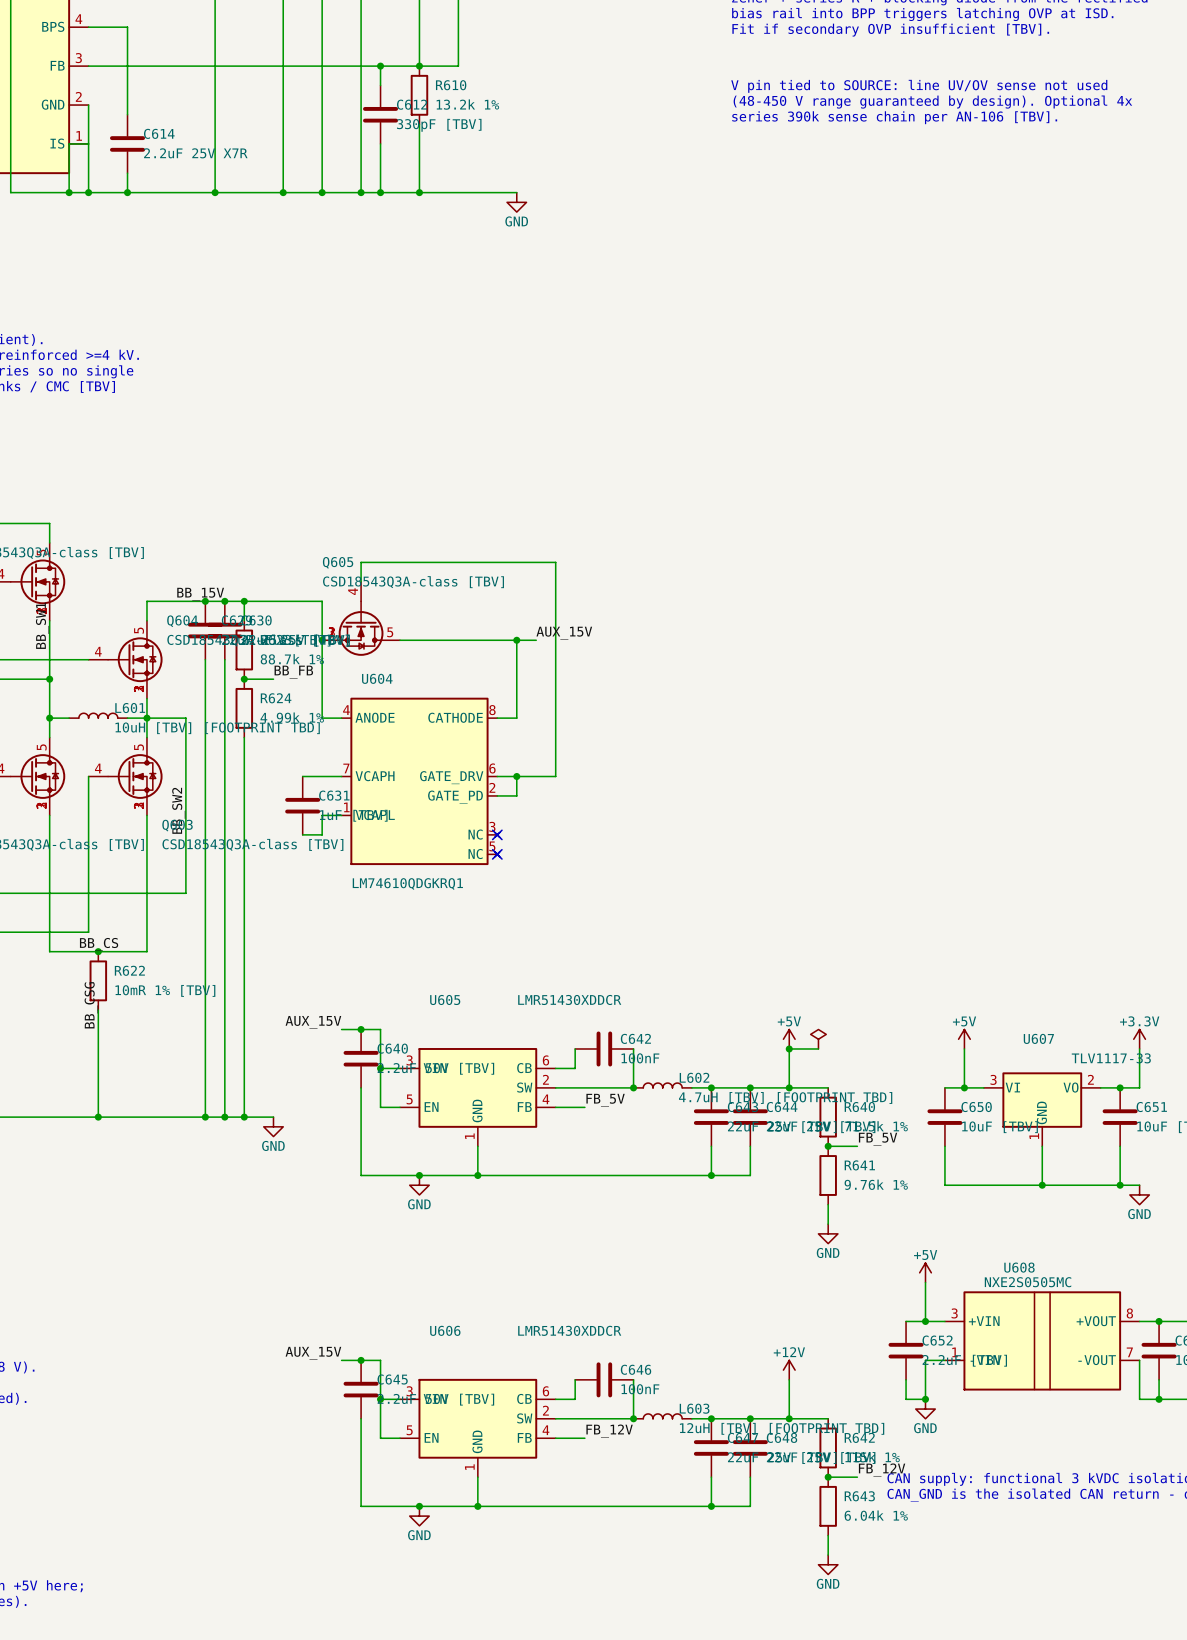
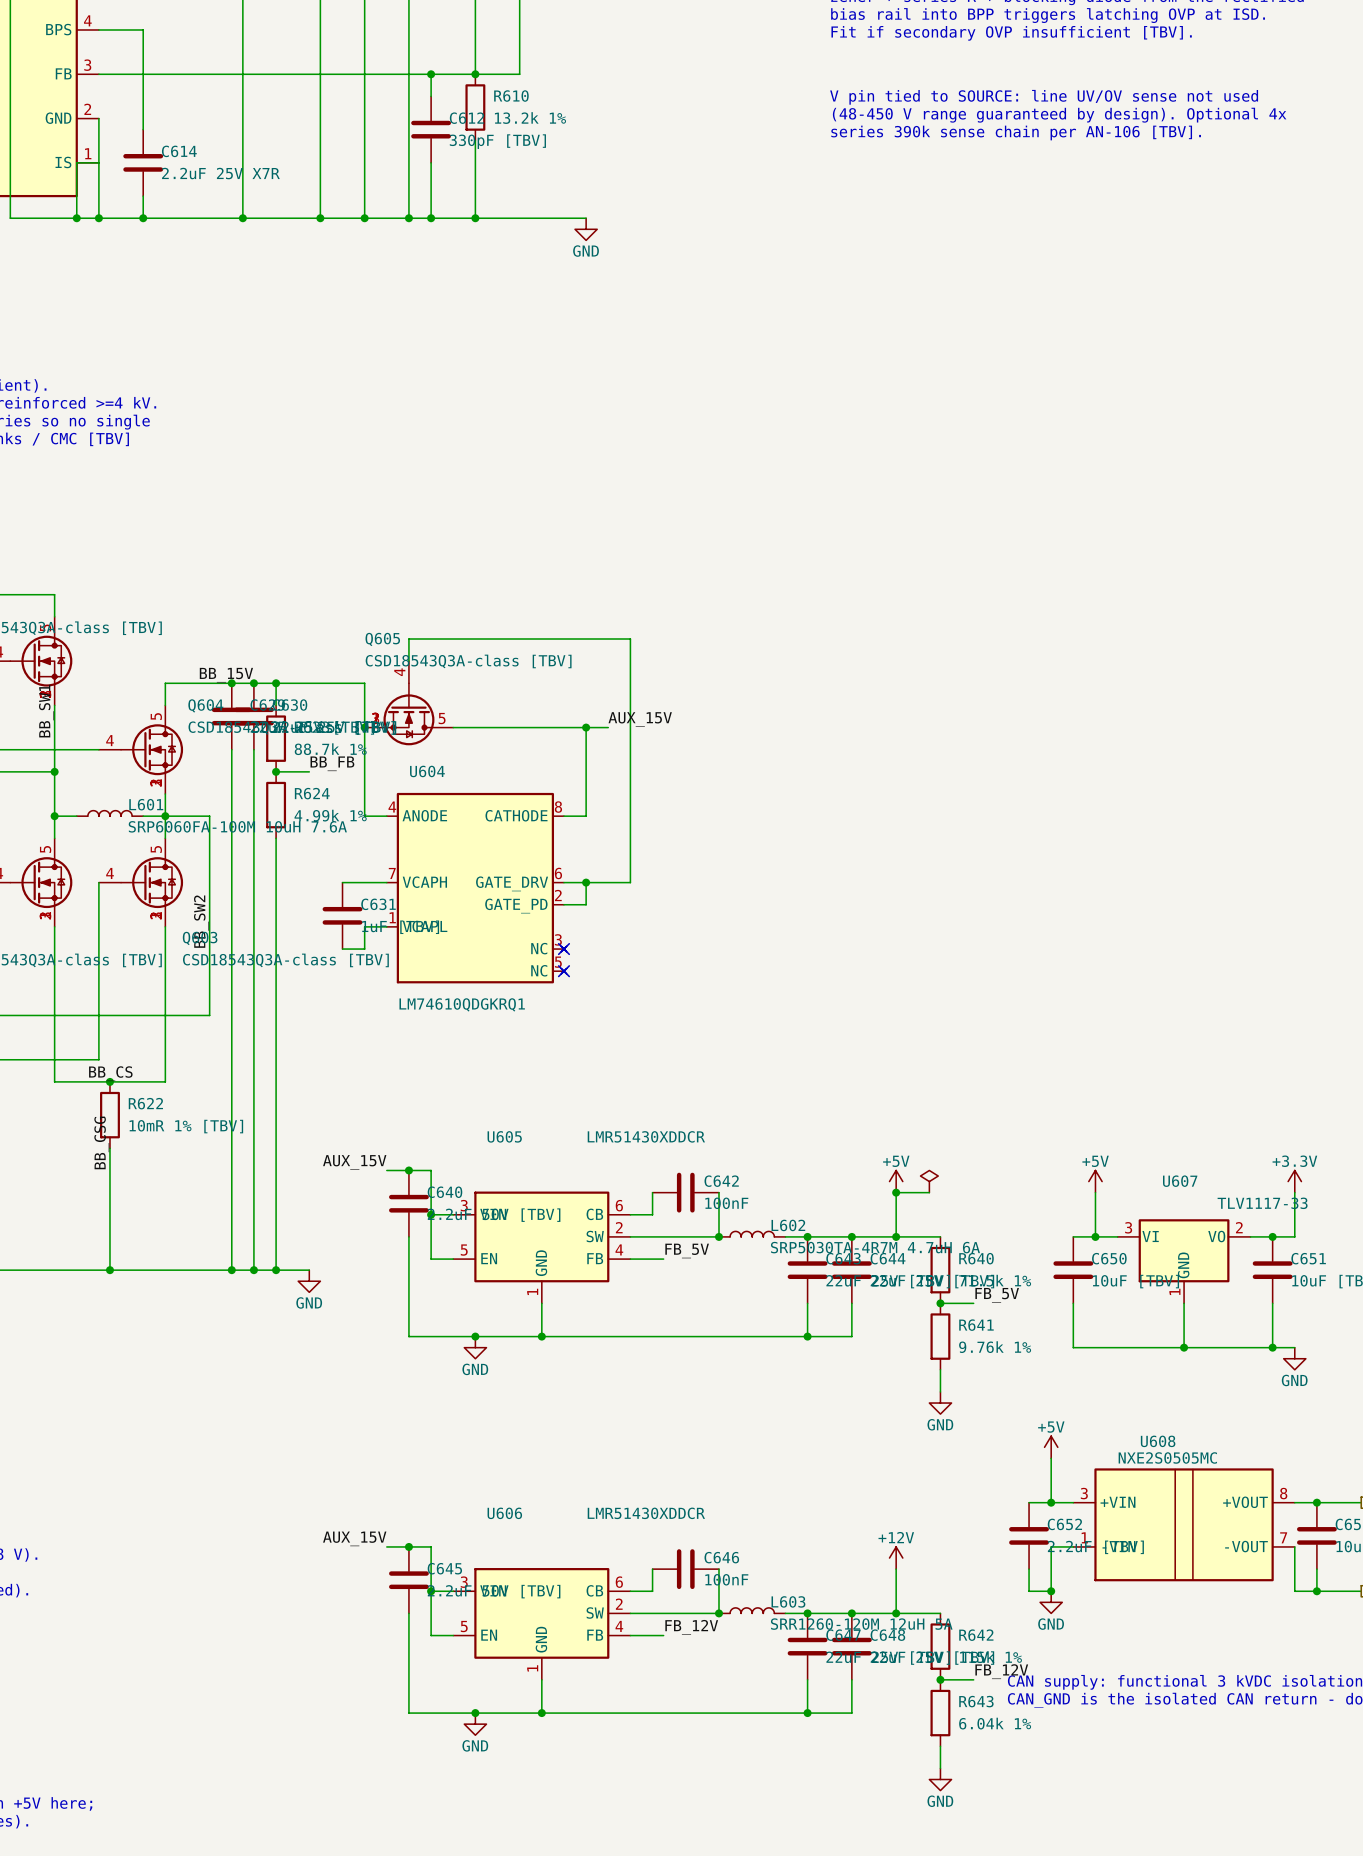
L601 value: 10uH [TBV] [FOOTPRINT TBD] (217, 728) -> SRP6060FA-100M 10uH 7.6A (237, 826)
L602 value: 4.7uH [TBV] [FOOTPRINT TBD] (785, 1097) -> SRP5030TA-4R7M 4.7uH 6A (875, 1247)
L603 value: 12uH [TBV] [FOOTPRINT TBD] (782, 1428) -> SRR1260-120M 12uH 5A (861, 1624)

